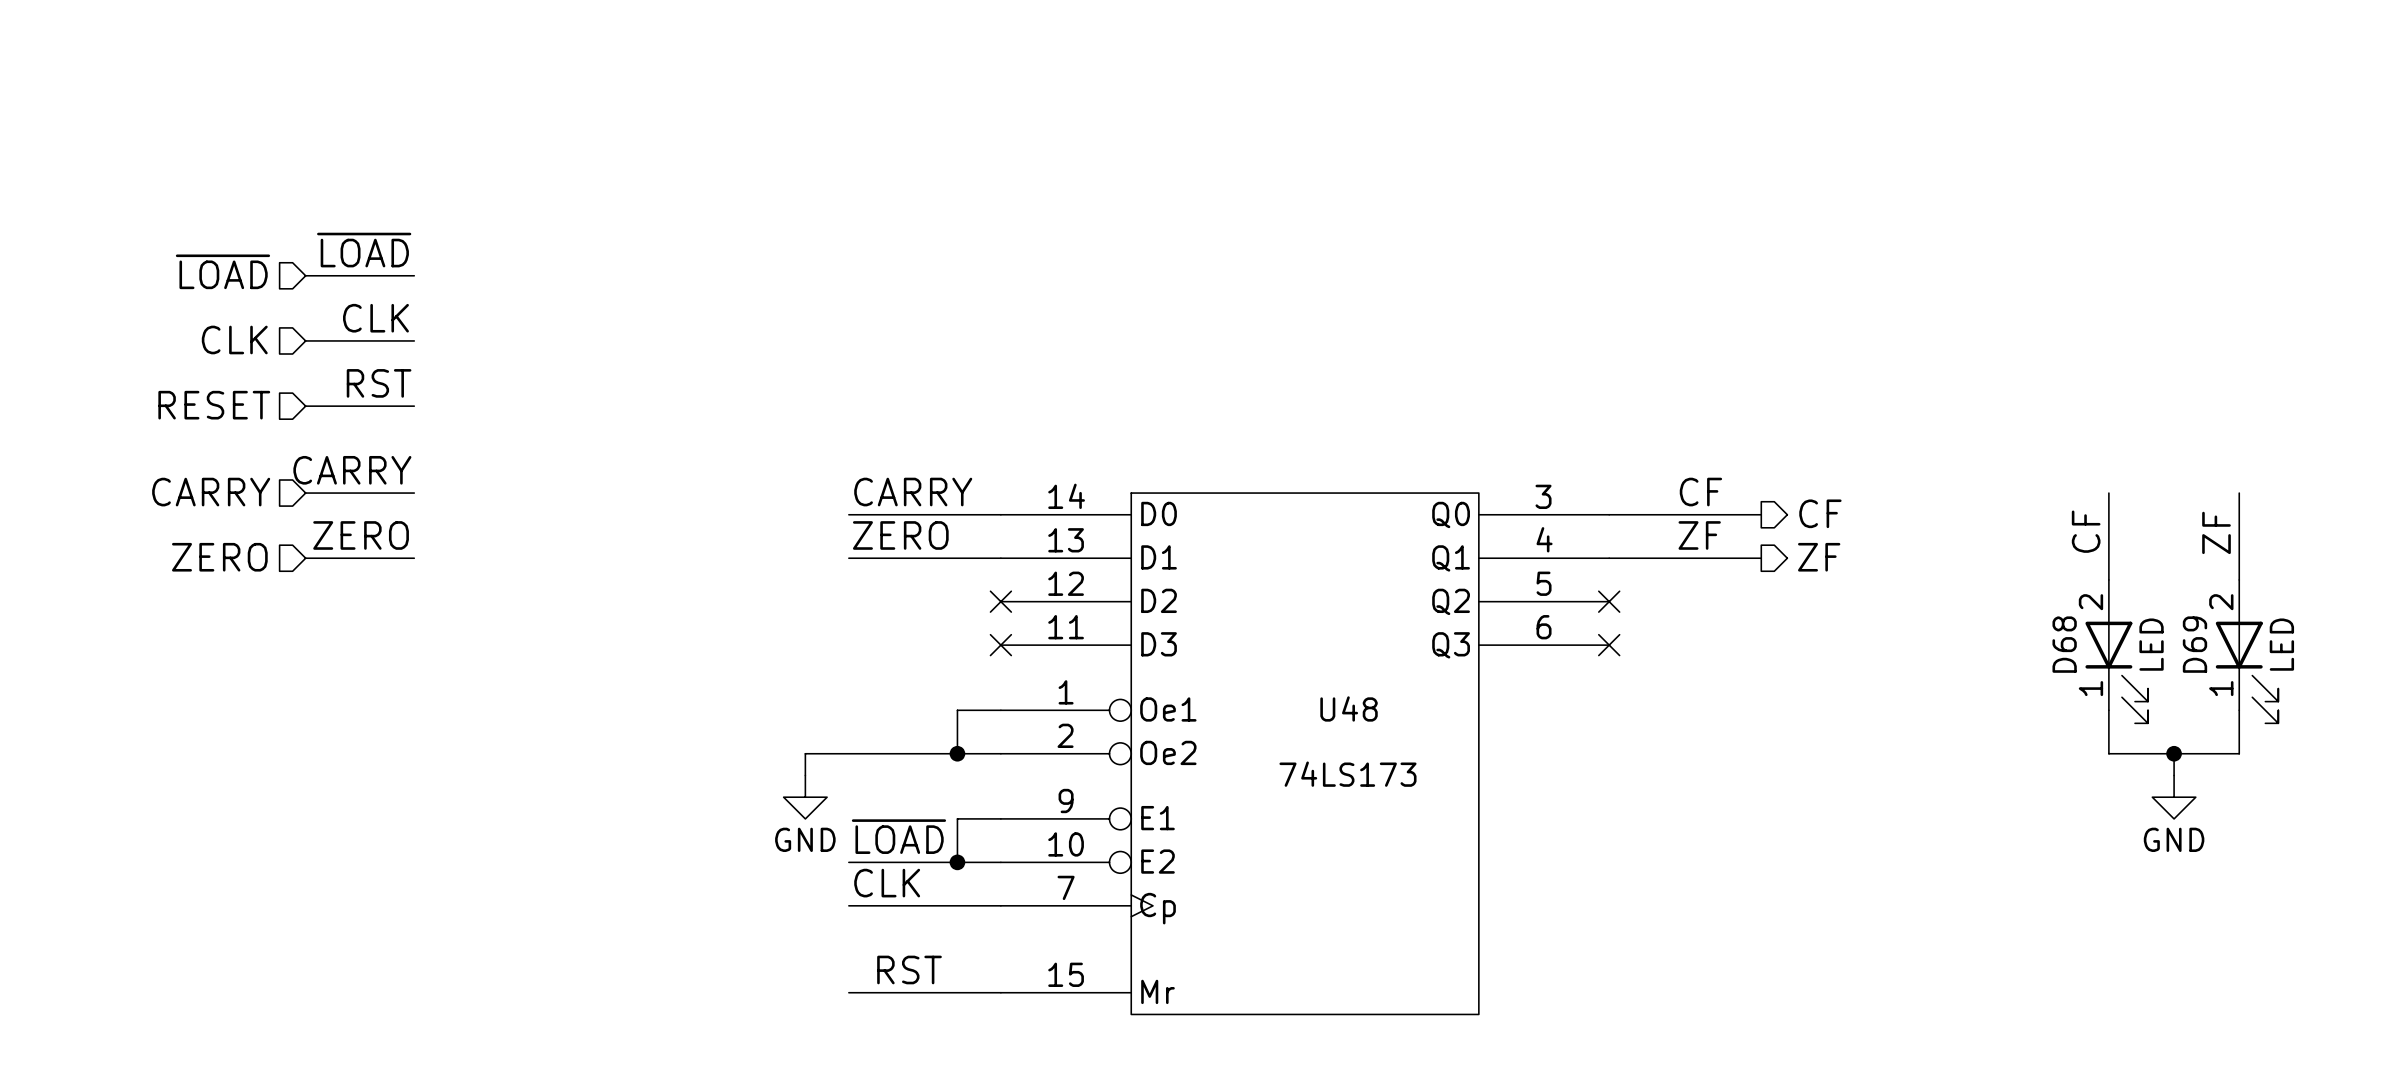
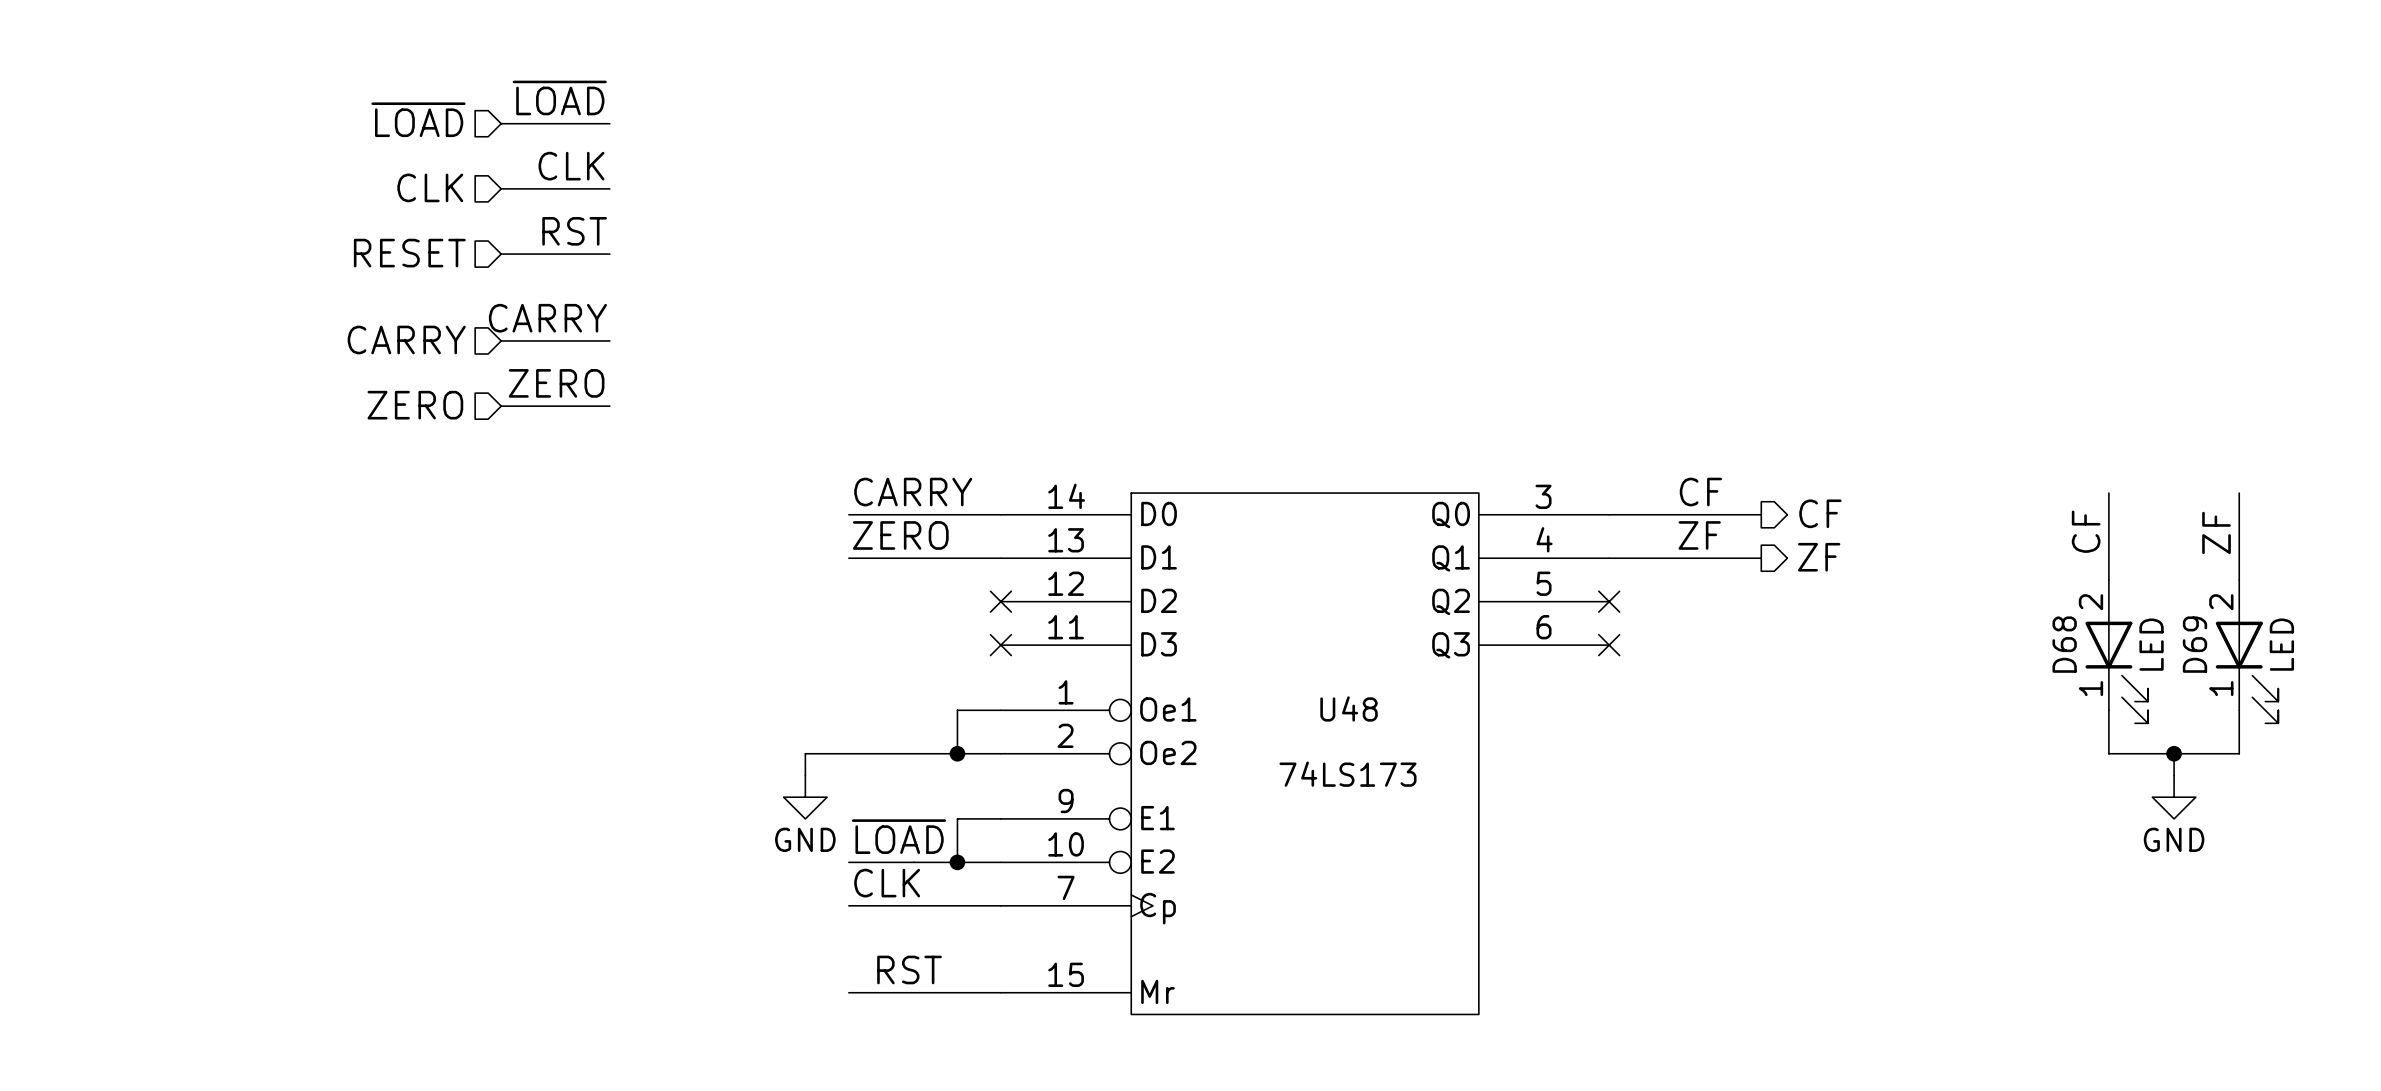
label position: ~{LOAD} (364, 250) -> ~{LOAD} (559, 97)
hierarchical label position: ~{LOAD} (222, 271) -> ~{LOAD} (418, 119)
wire: (305, 275) (414, 275) -> (501, 123) (609, 123)
label position: CLK (375, 318) -> CLK (571, 166)
hierarchical label position: CLK (234, 339) -> CLK (430, 187)
wire: (305, 340) (414, 340) -> (501, 188) (609, 188)
label position: RST (379, 383) -> RST (574, 231)
hierarchical label position: RESET (214, 405) -> RESET (409, 253)
wire: (305, 406) (414, 406) -> (501, 254) (609, 254)
label position: CARRY (352, 470) -> CARRY (547, 318)
hierarchical label position: CARRY (211, 492) -> CARRY (406, 339)
wire: (305, 493) (414, 493) -> (501, 340) (609, 340)
label position: ZERO (361, 535) -> ZERO (556, 383)
hierarchical label position: ZERO (219, 557) -> ZERO (415, 405)
wire: (305, 558) (414, 558) -> (501, 406) (609, 406)

